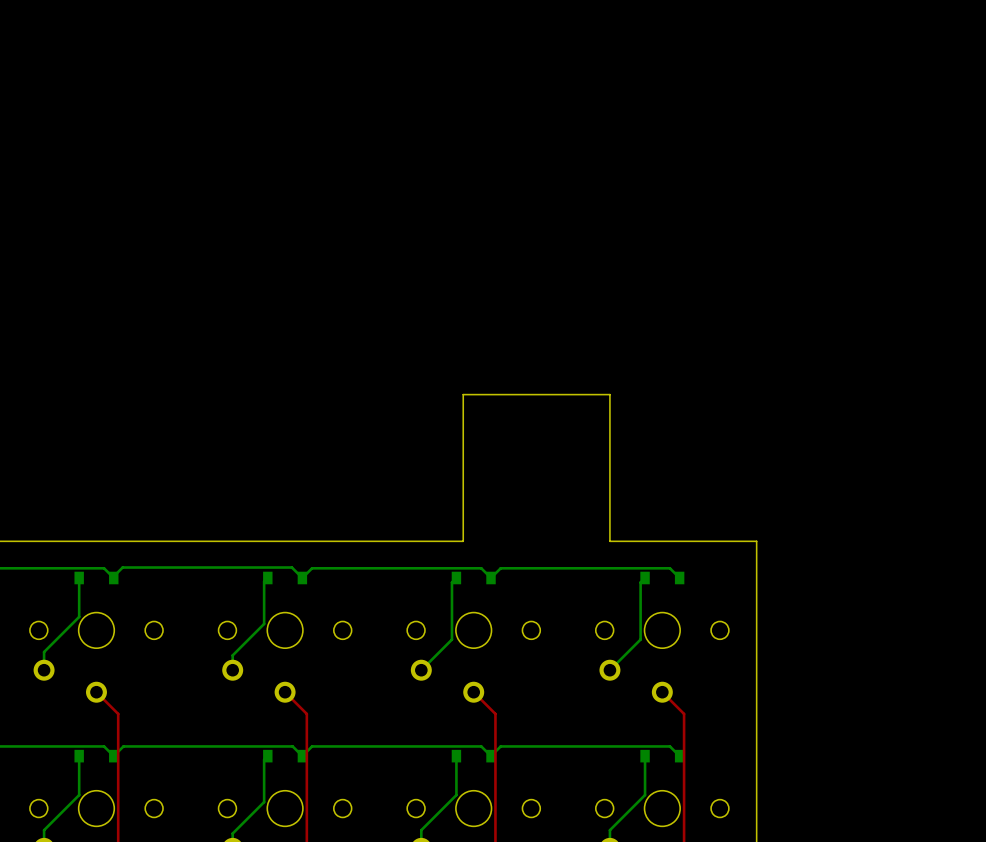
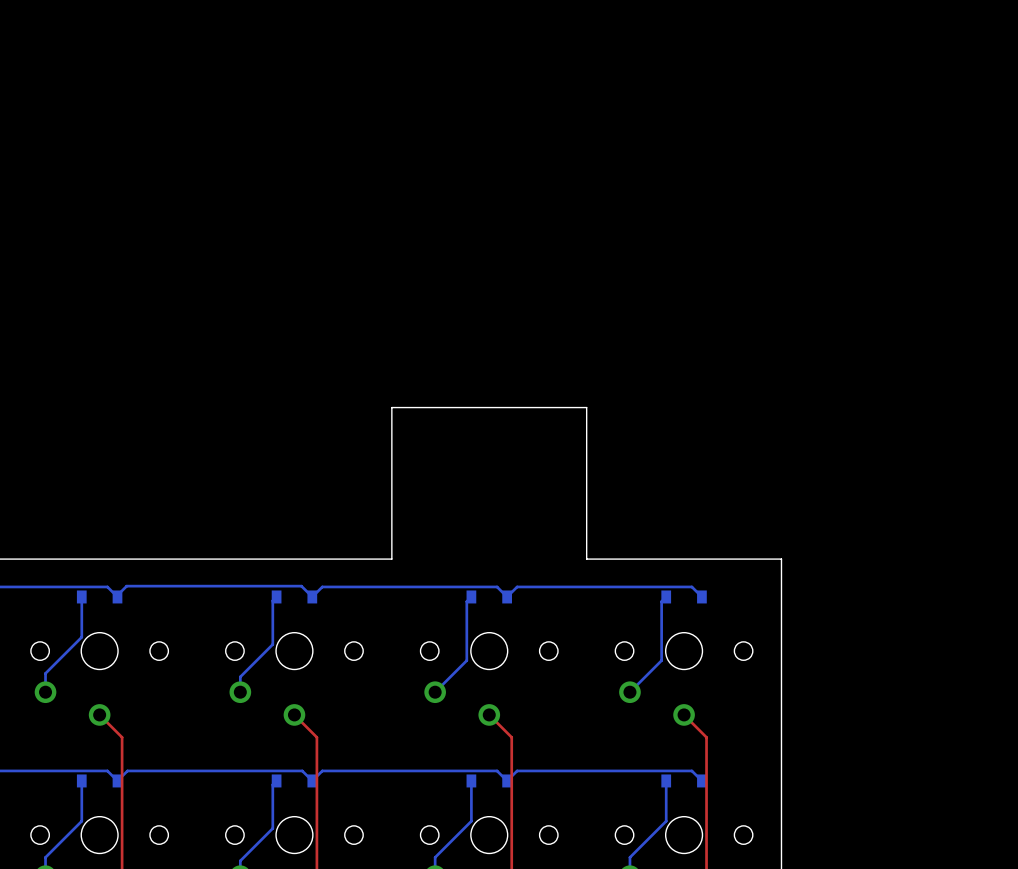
board edge: (463, 394) (463, 541) (379, 541) -> (478, 407) (391, 407) (391, 559)
board edge: (568, 394) (609, 394) (609, 541) -> (586, 407) (586, 559) (629, 559)

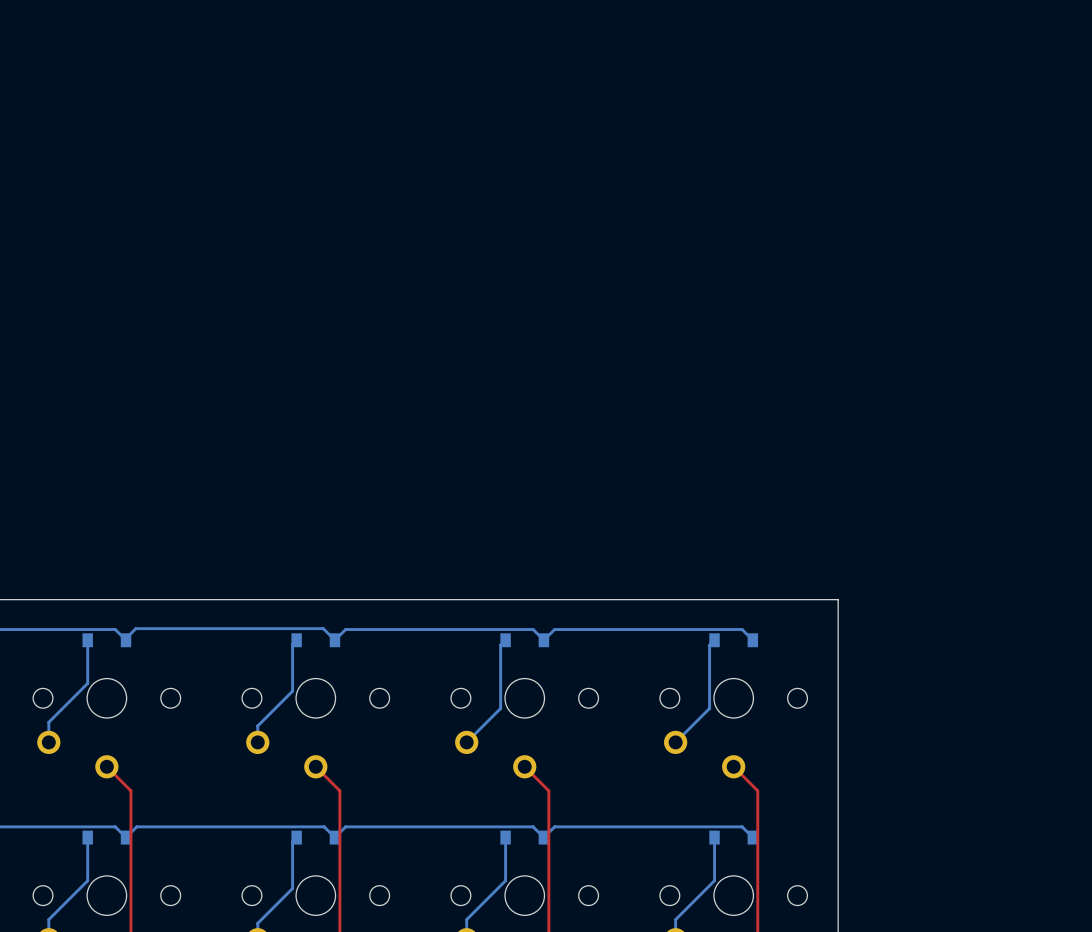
board edge: (391, 559) (391, 407) (586, 407) (586, 559) -> (420, 599) (629, 599)

